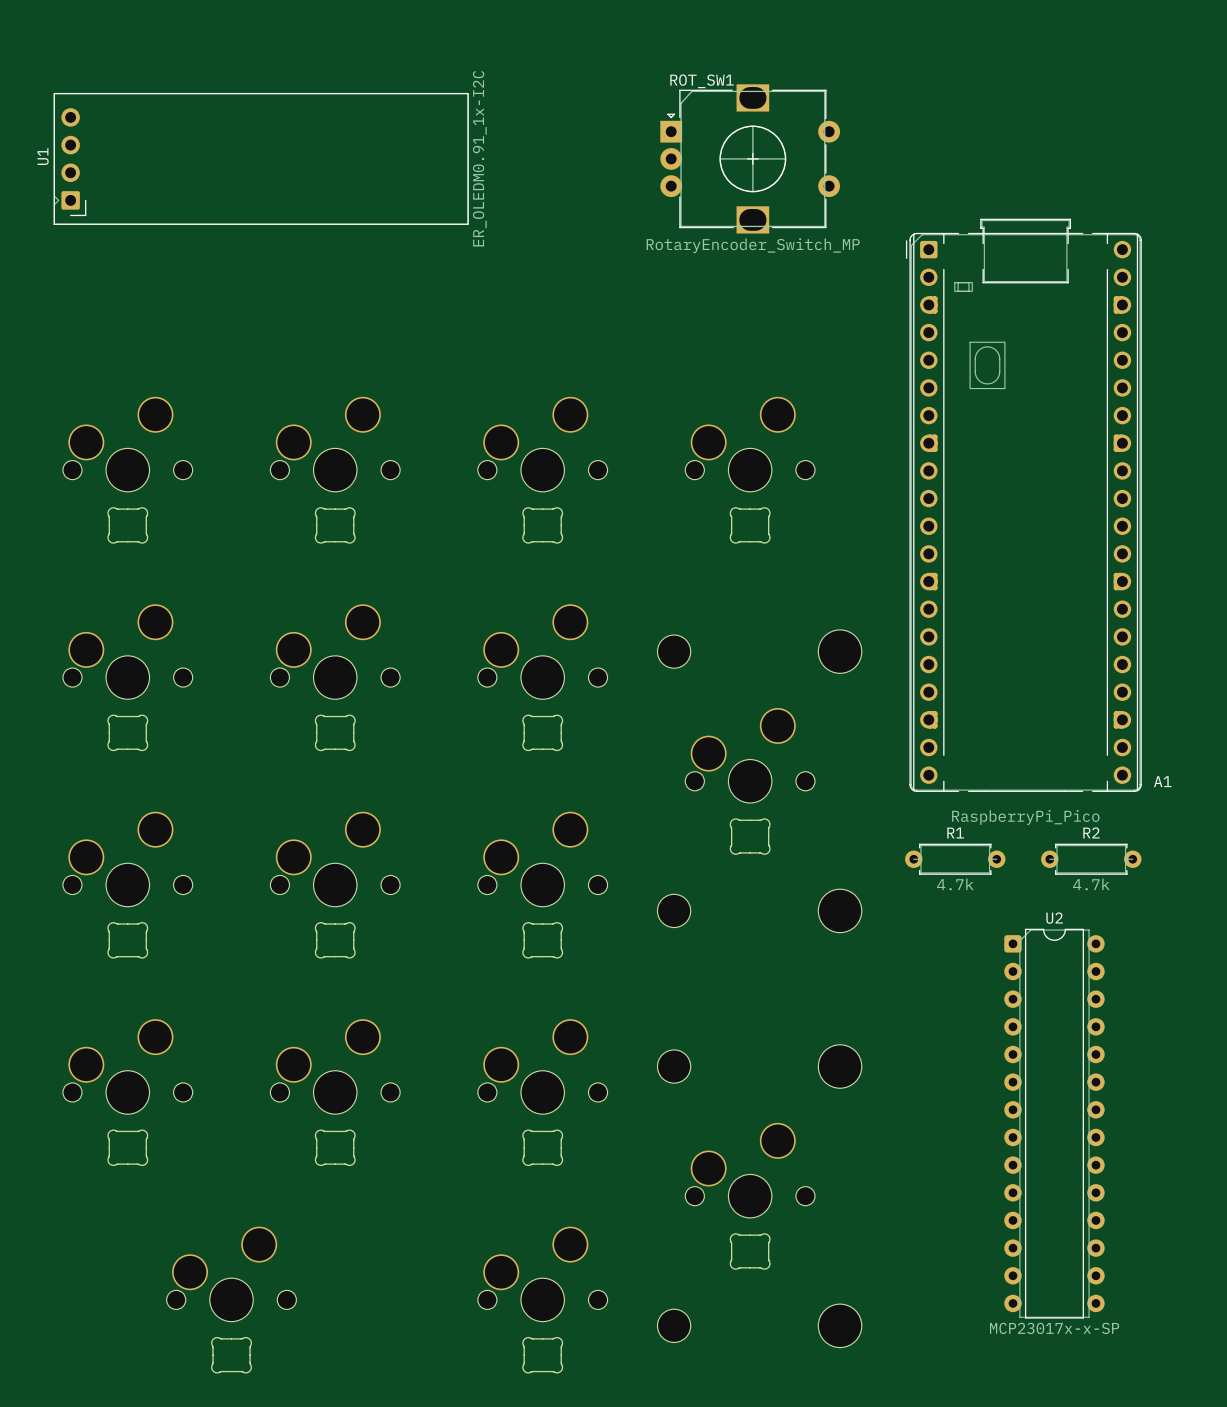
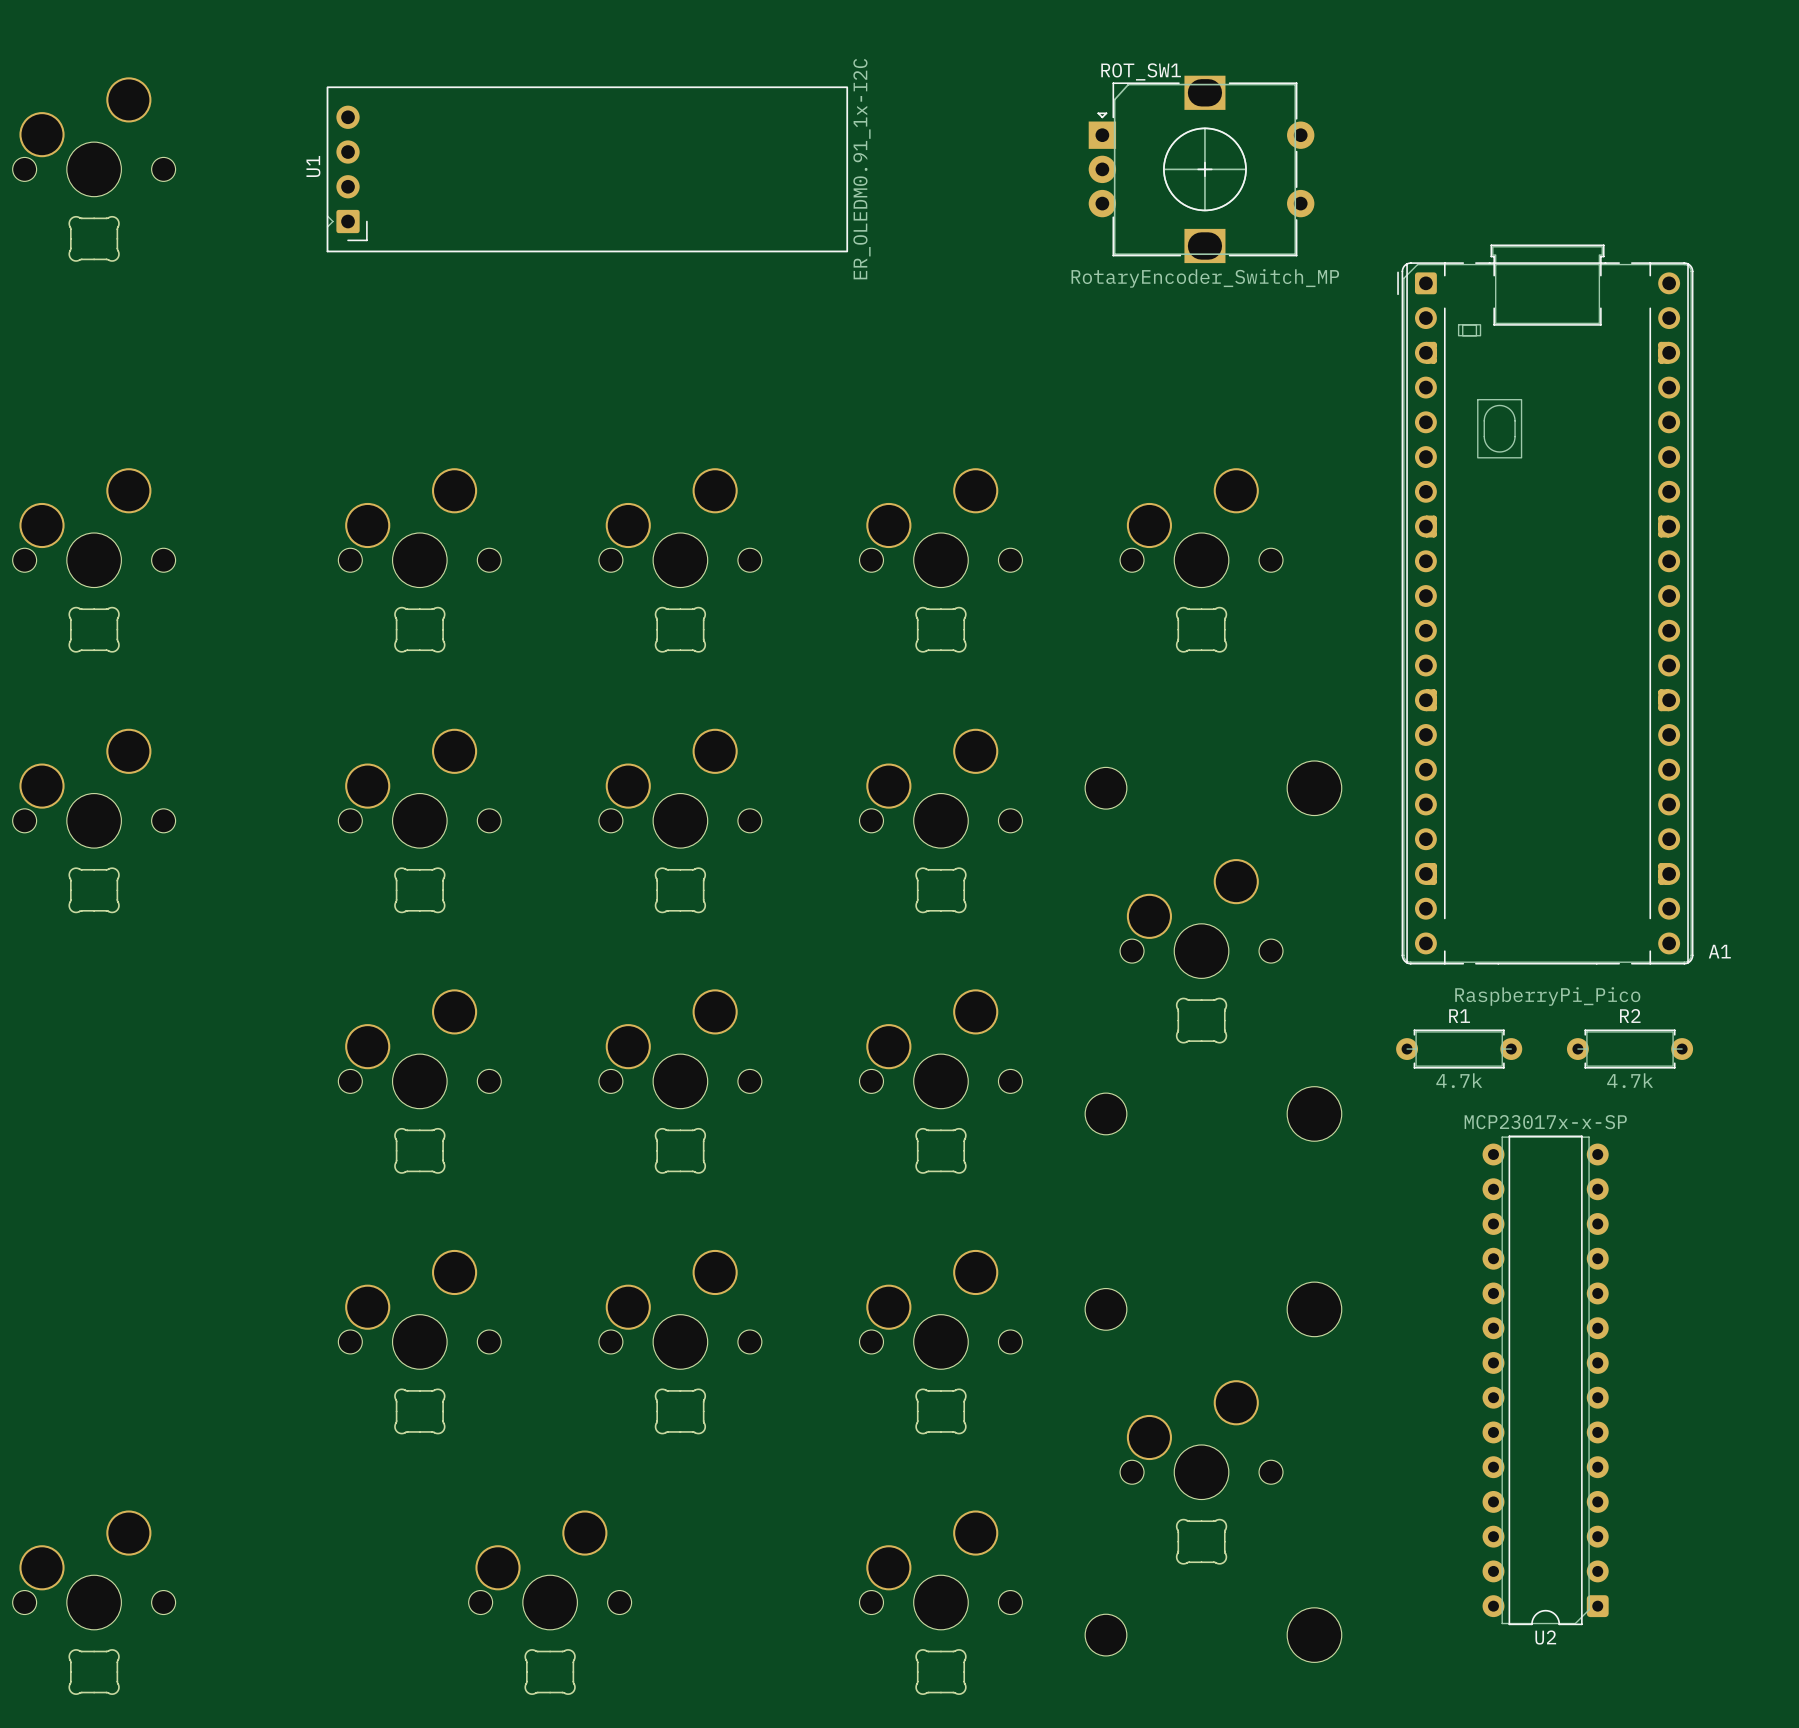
U2 rotation: 0° (1054, 1123) -> 180° (1545, 1380)

